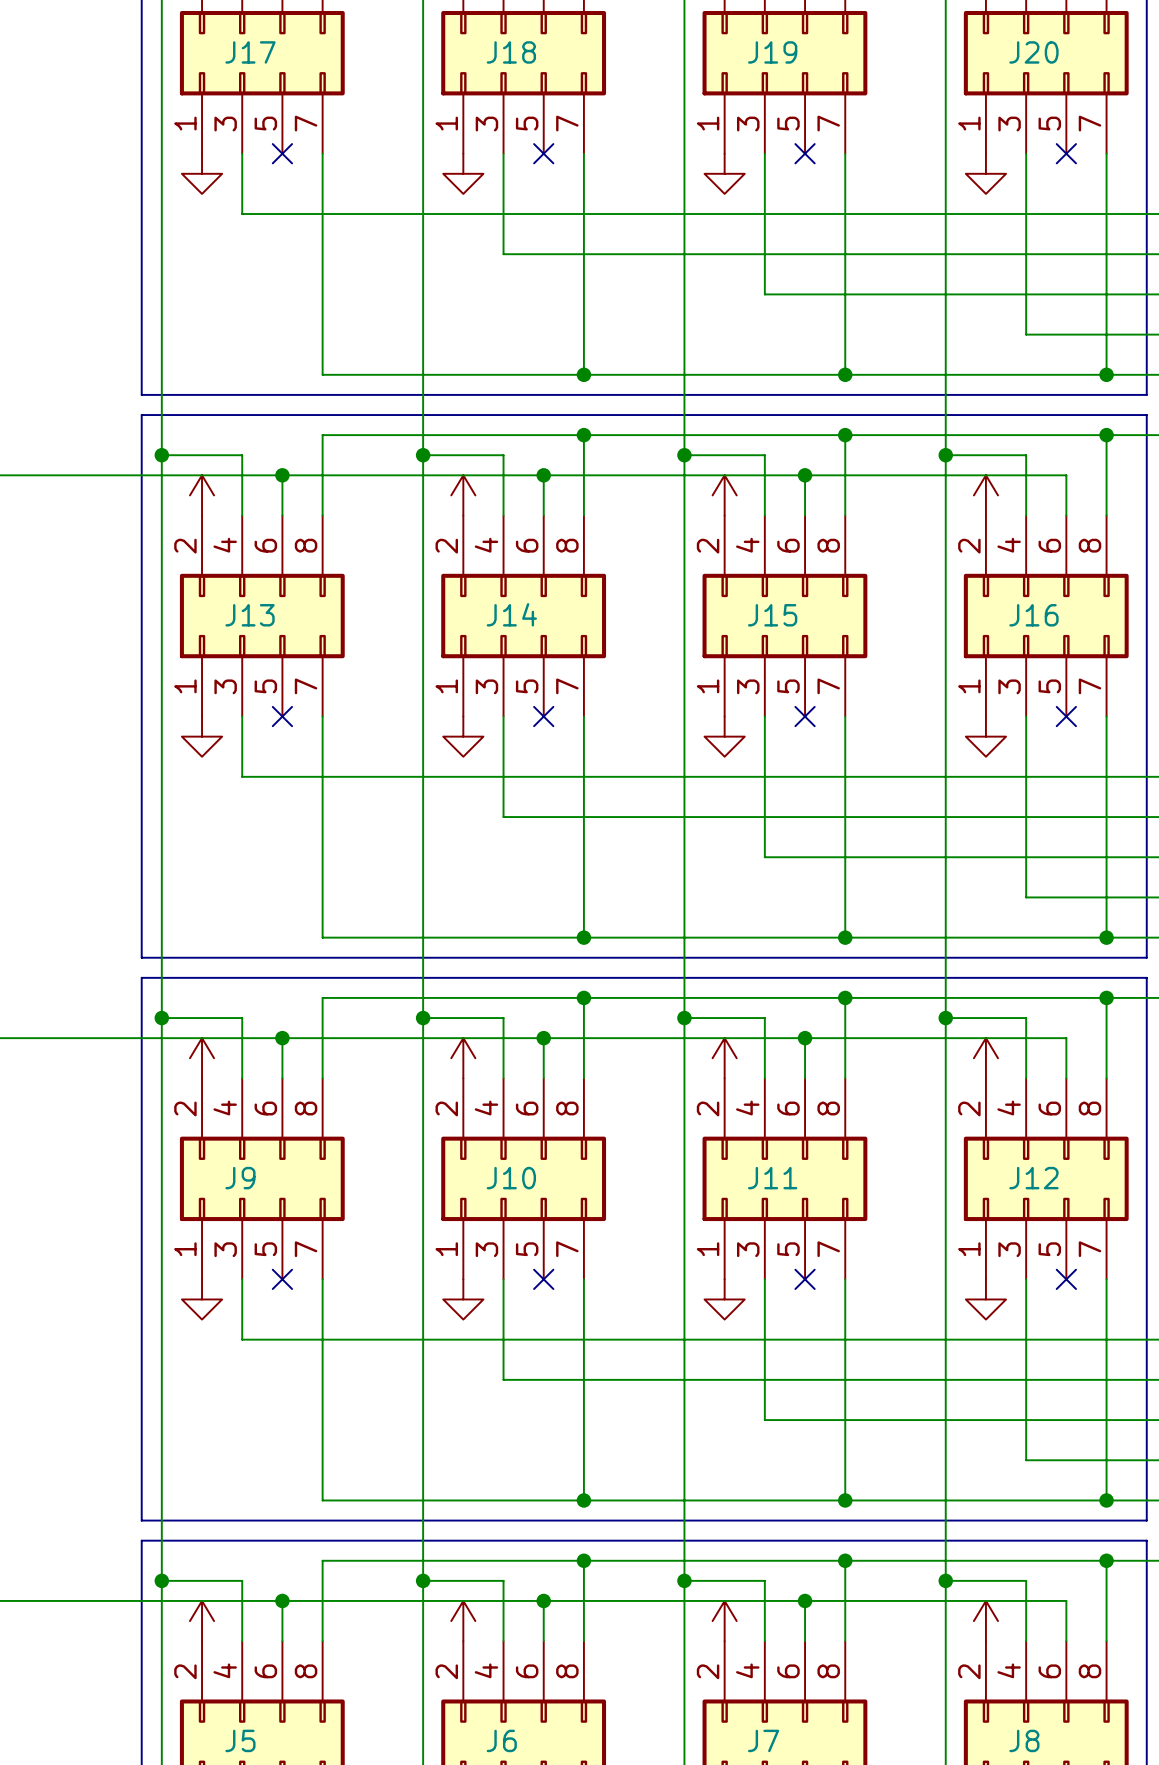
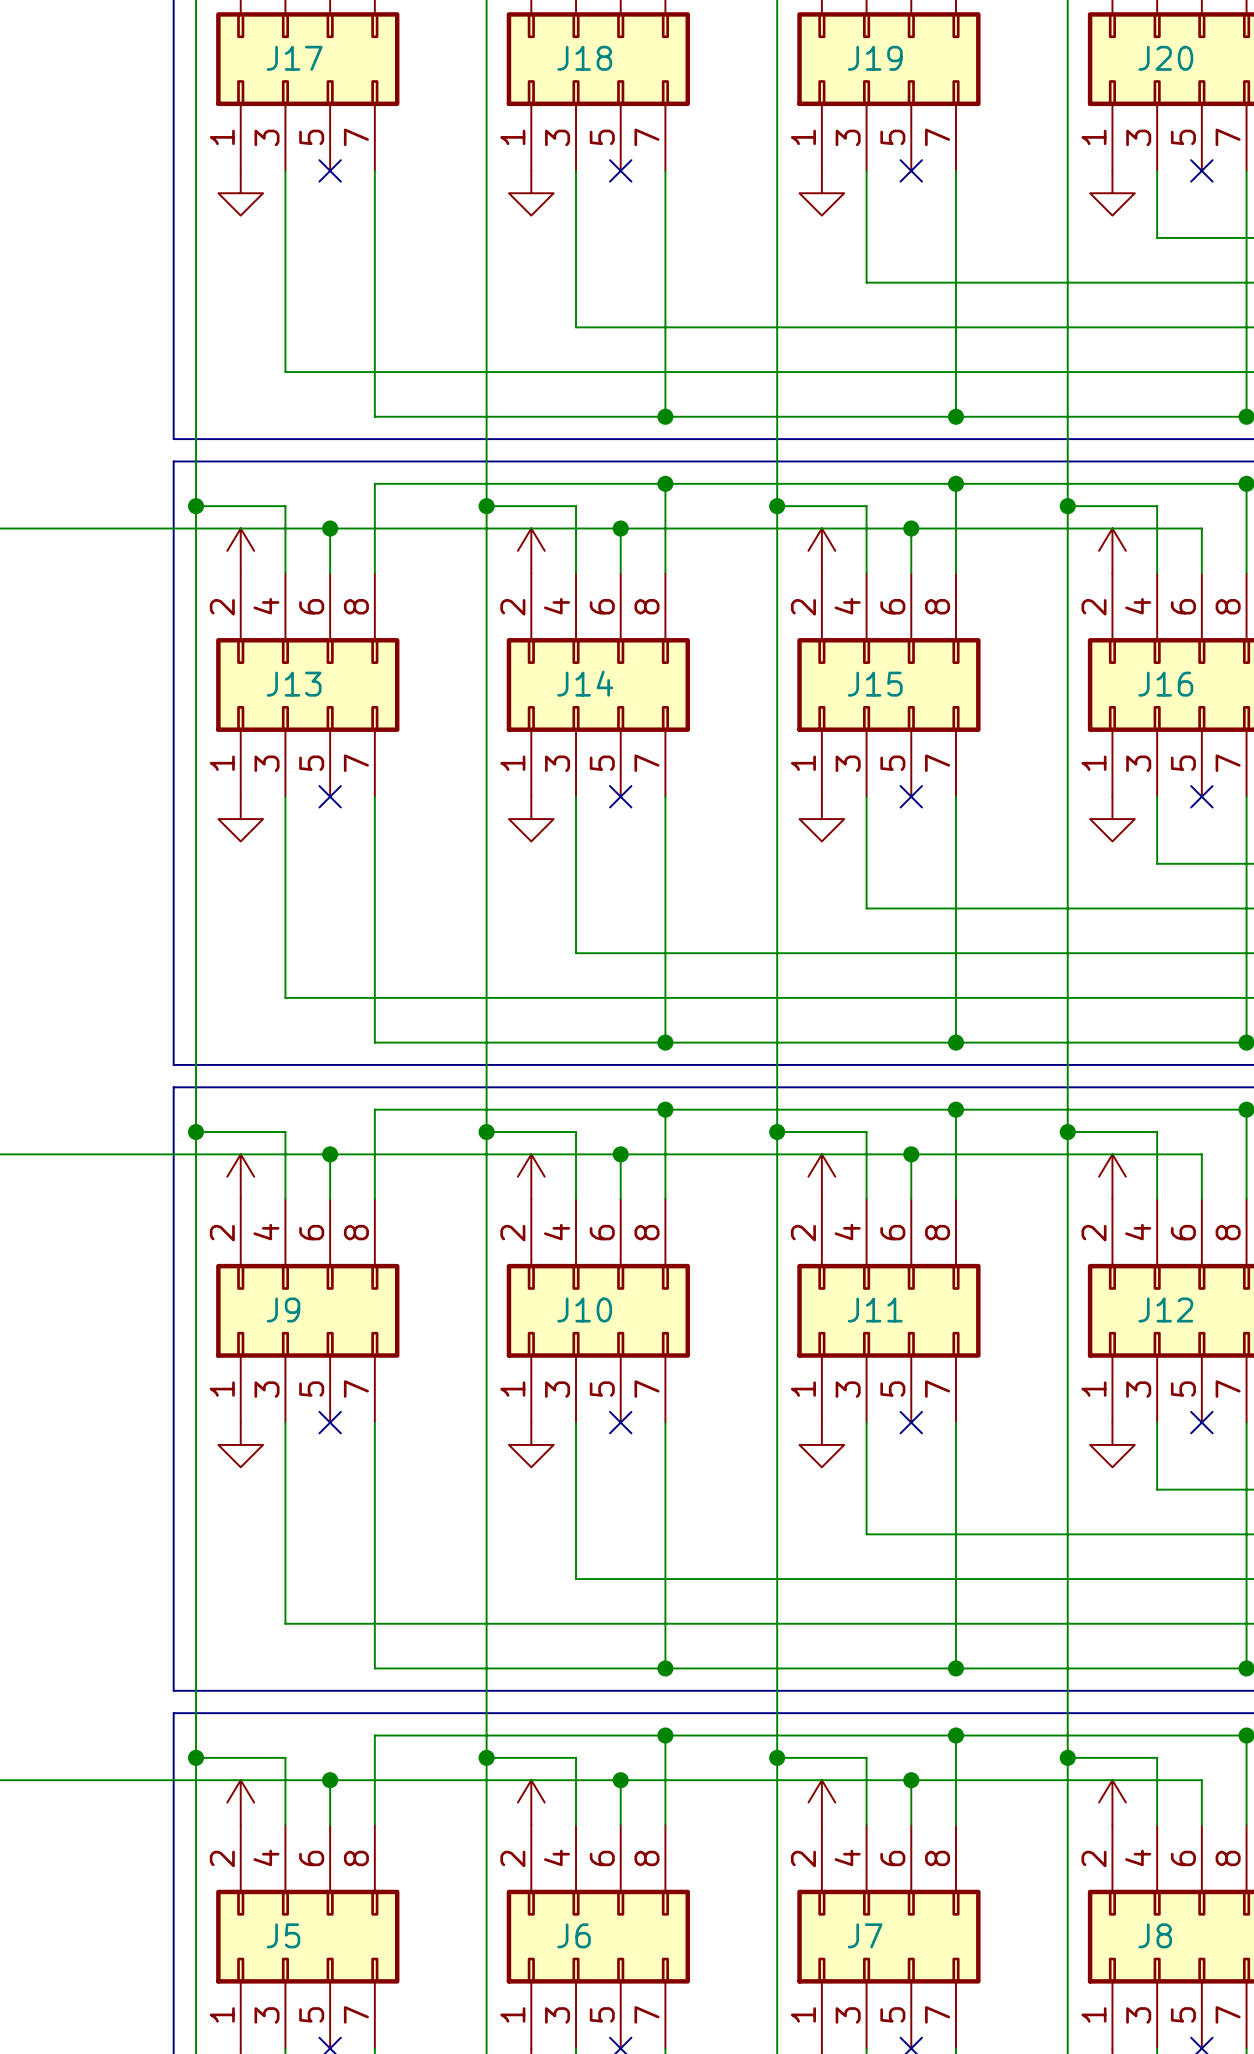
wire: (242, 214) (1026, 214) (1026, 334) -> (285, 237) (285, 372) (1157, 372)
wire: (503, 254) (764, 254) (764, 294) -> (576, 282) (576, 327) (866, 327)
wire: (242, 776) (1026, 776) (1026, 897) -> (285, 863) (285, 997) (1157, 997)
wire: (503, 817) (764, 817) (764, 857) -> (576, 908) (576, 953) (866, 953)
wire: (242, 1339) (1026, 1339) (1026, 1460) -> (285, 1489) (285, 1623) (1157, 1623)
wire: (503, 1379) (764, 1379) (764, 1420) -> (576, 1534) (576, 1579) (866, 1579)

